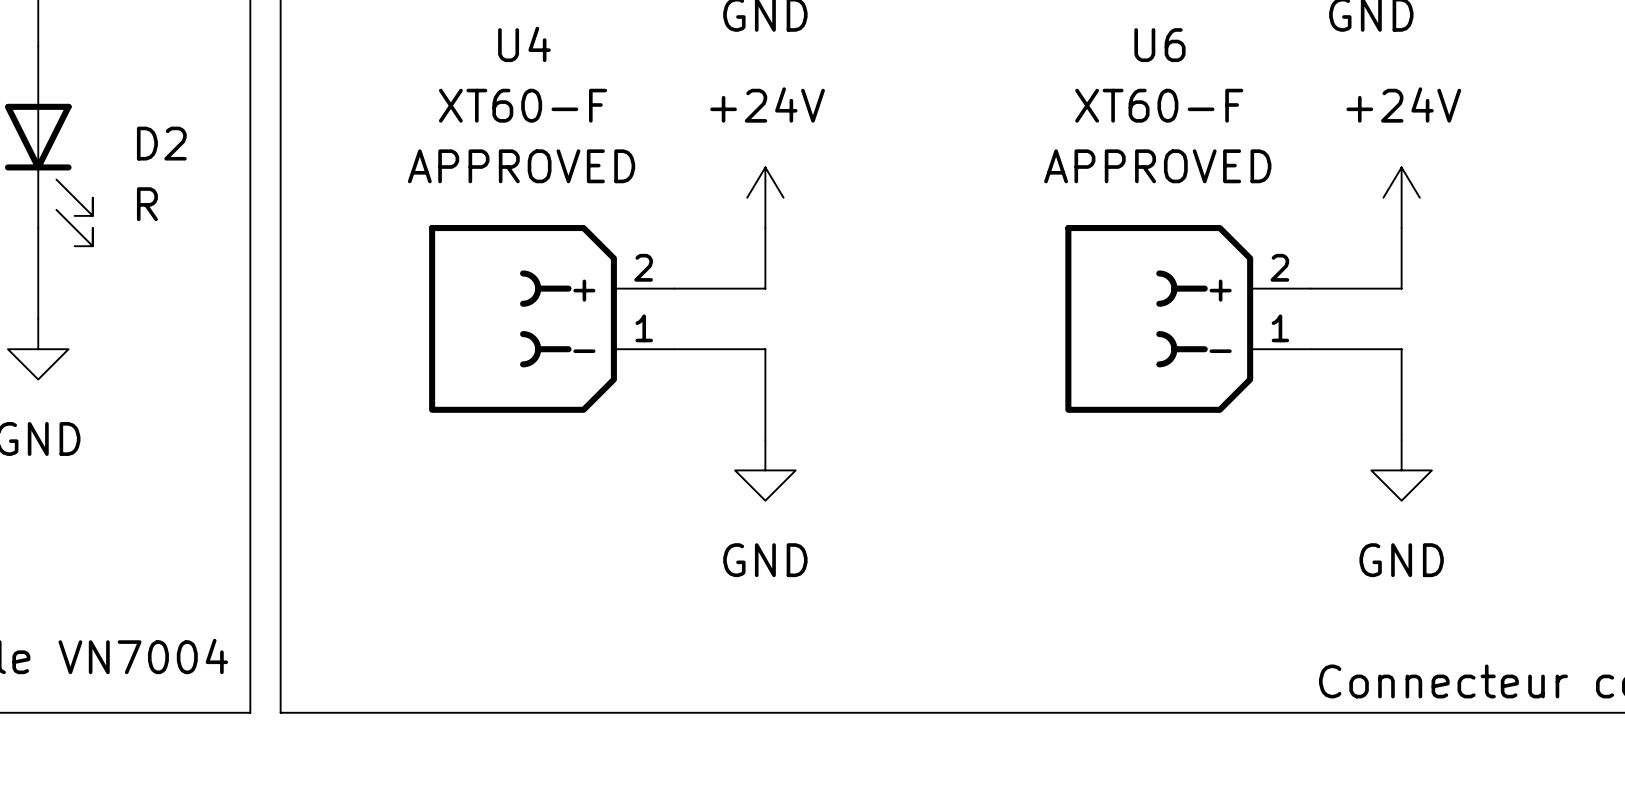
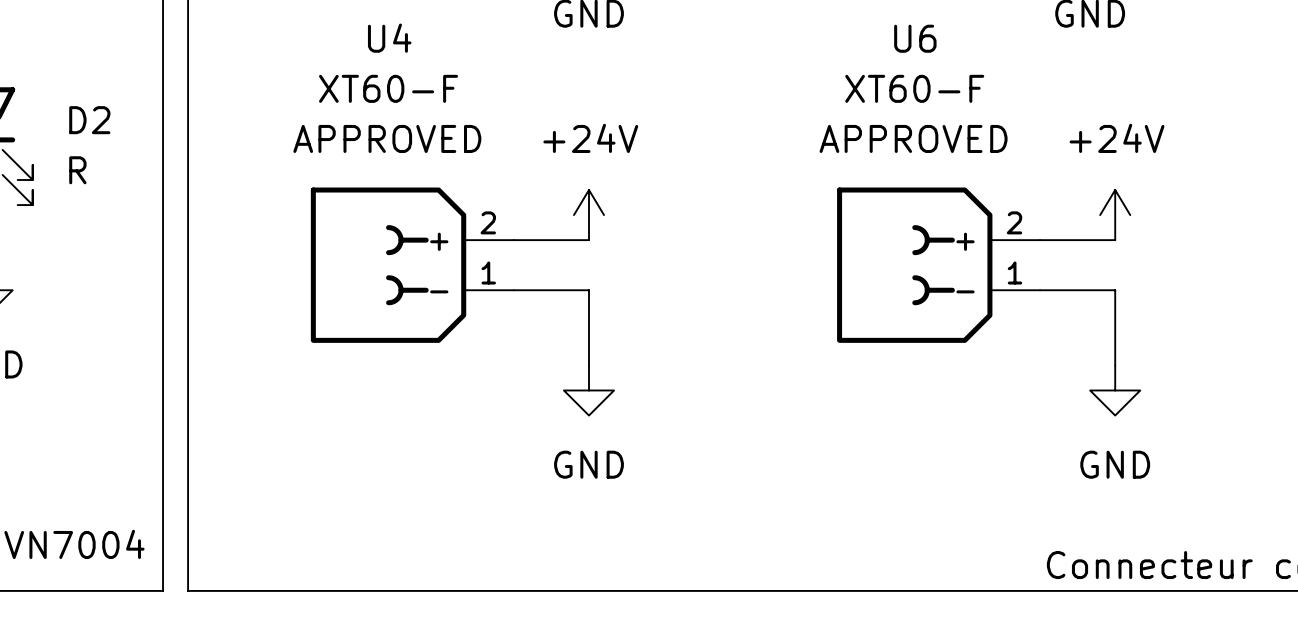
power symbol position: +24V (765, 197) -> +24V (589, 215)
power symbol position: +24V (1401, 197) -> +24V (1115, 215)

